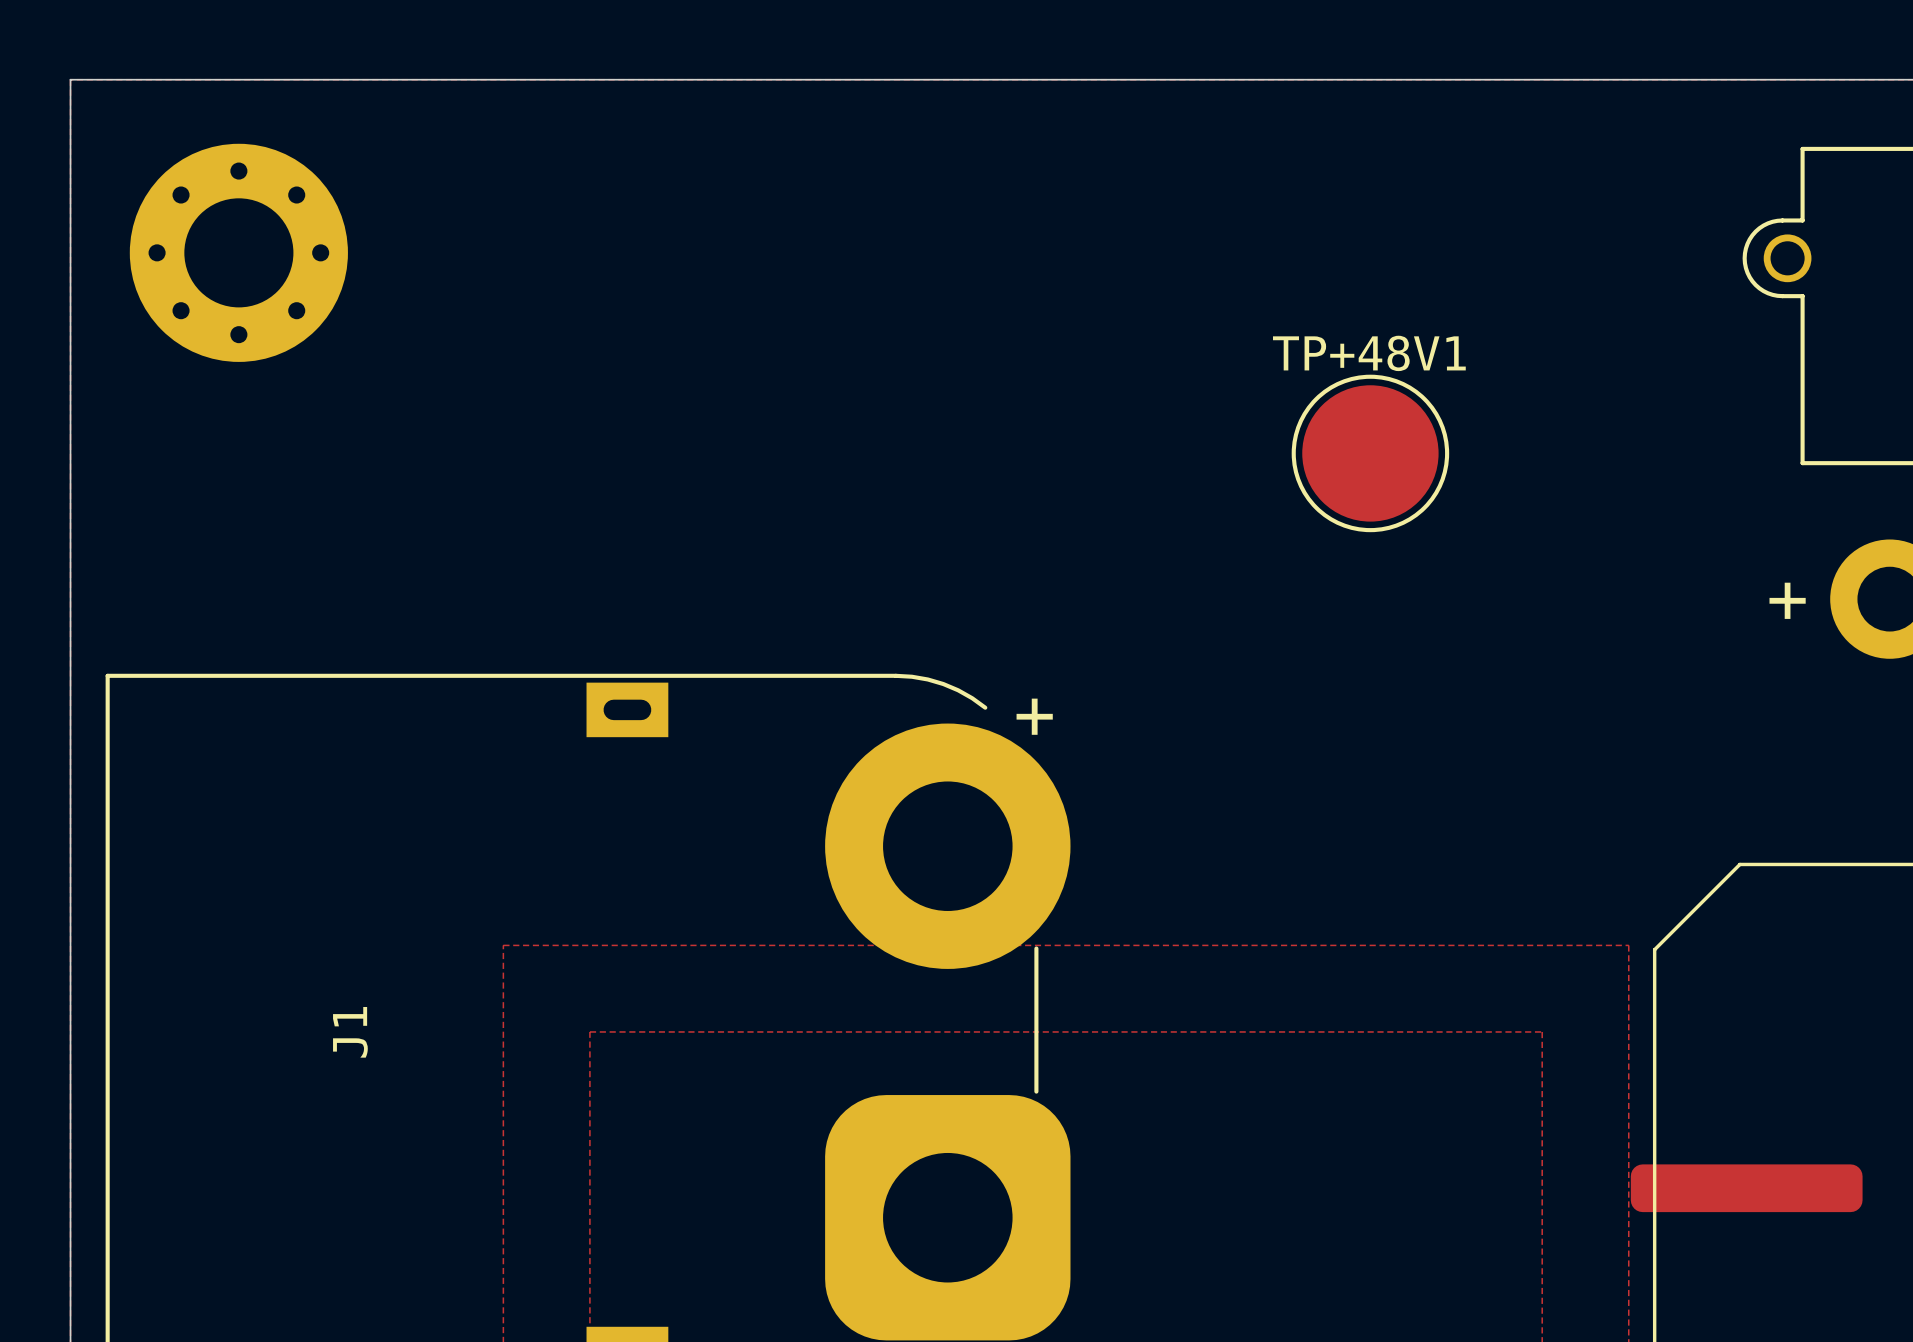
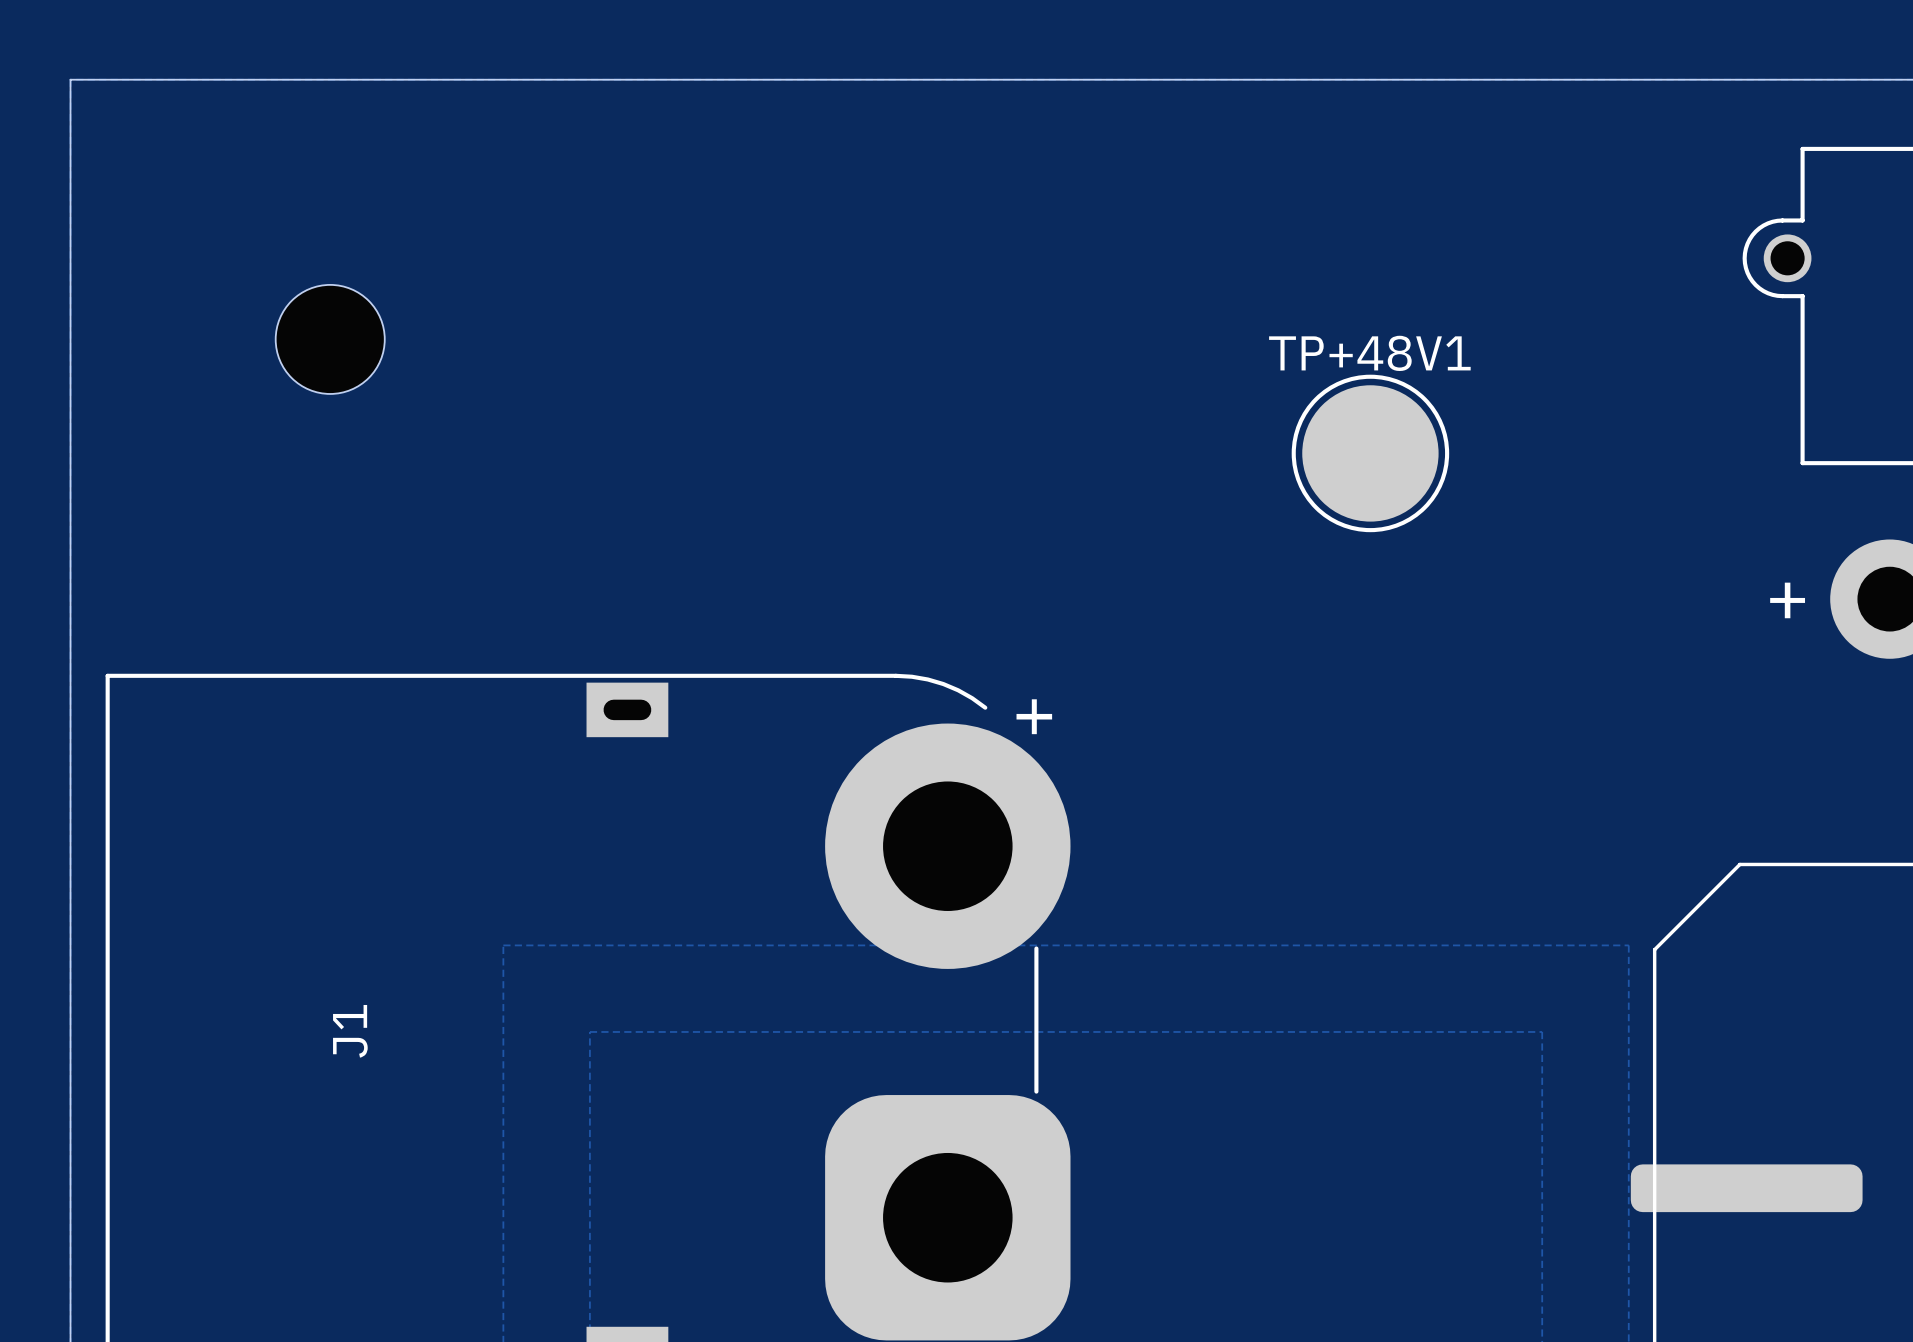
part: (238, 252) -> none
part: none -> (330, 339)

